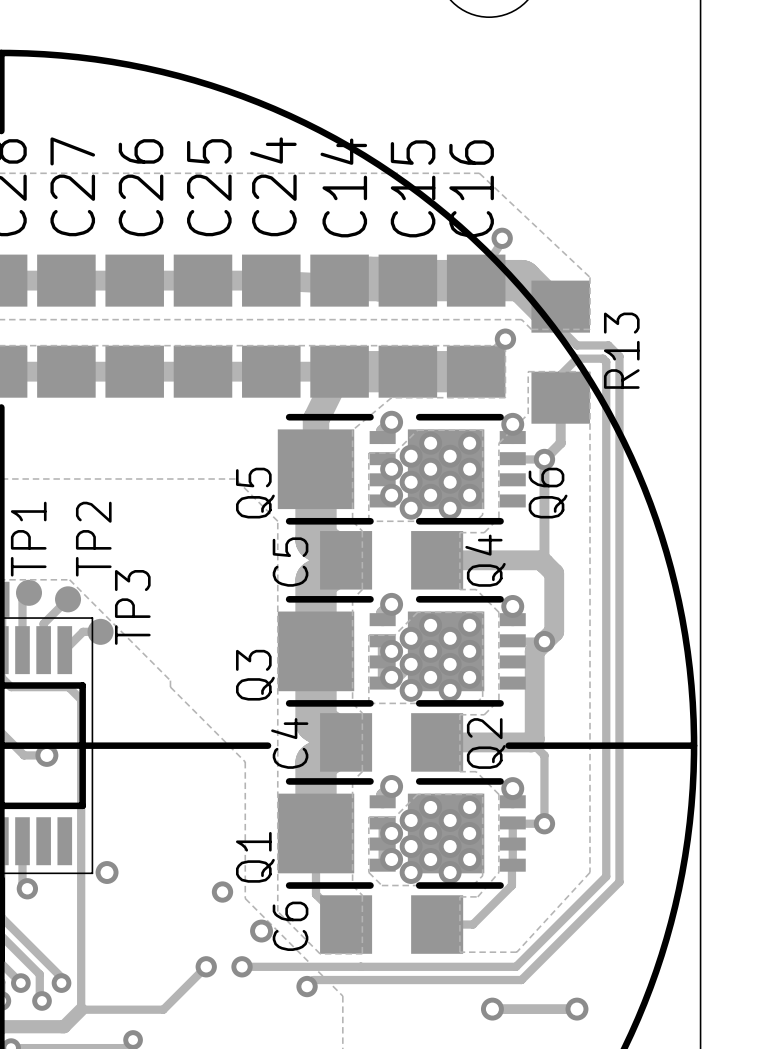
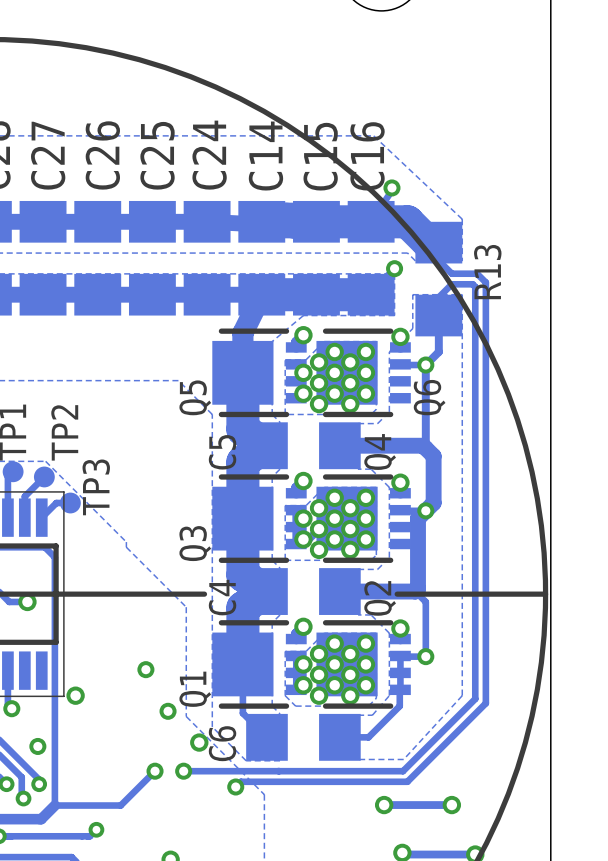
via: none -> (145, 669)
via: none -> (37, 746)

